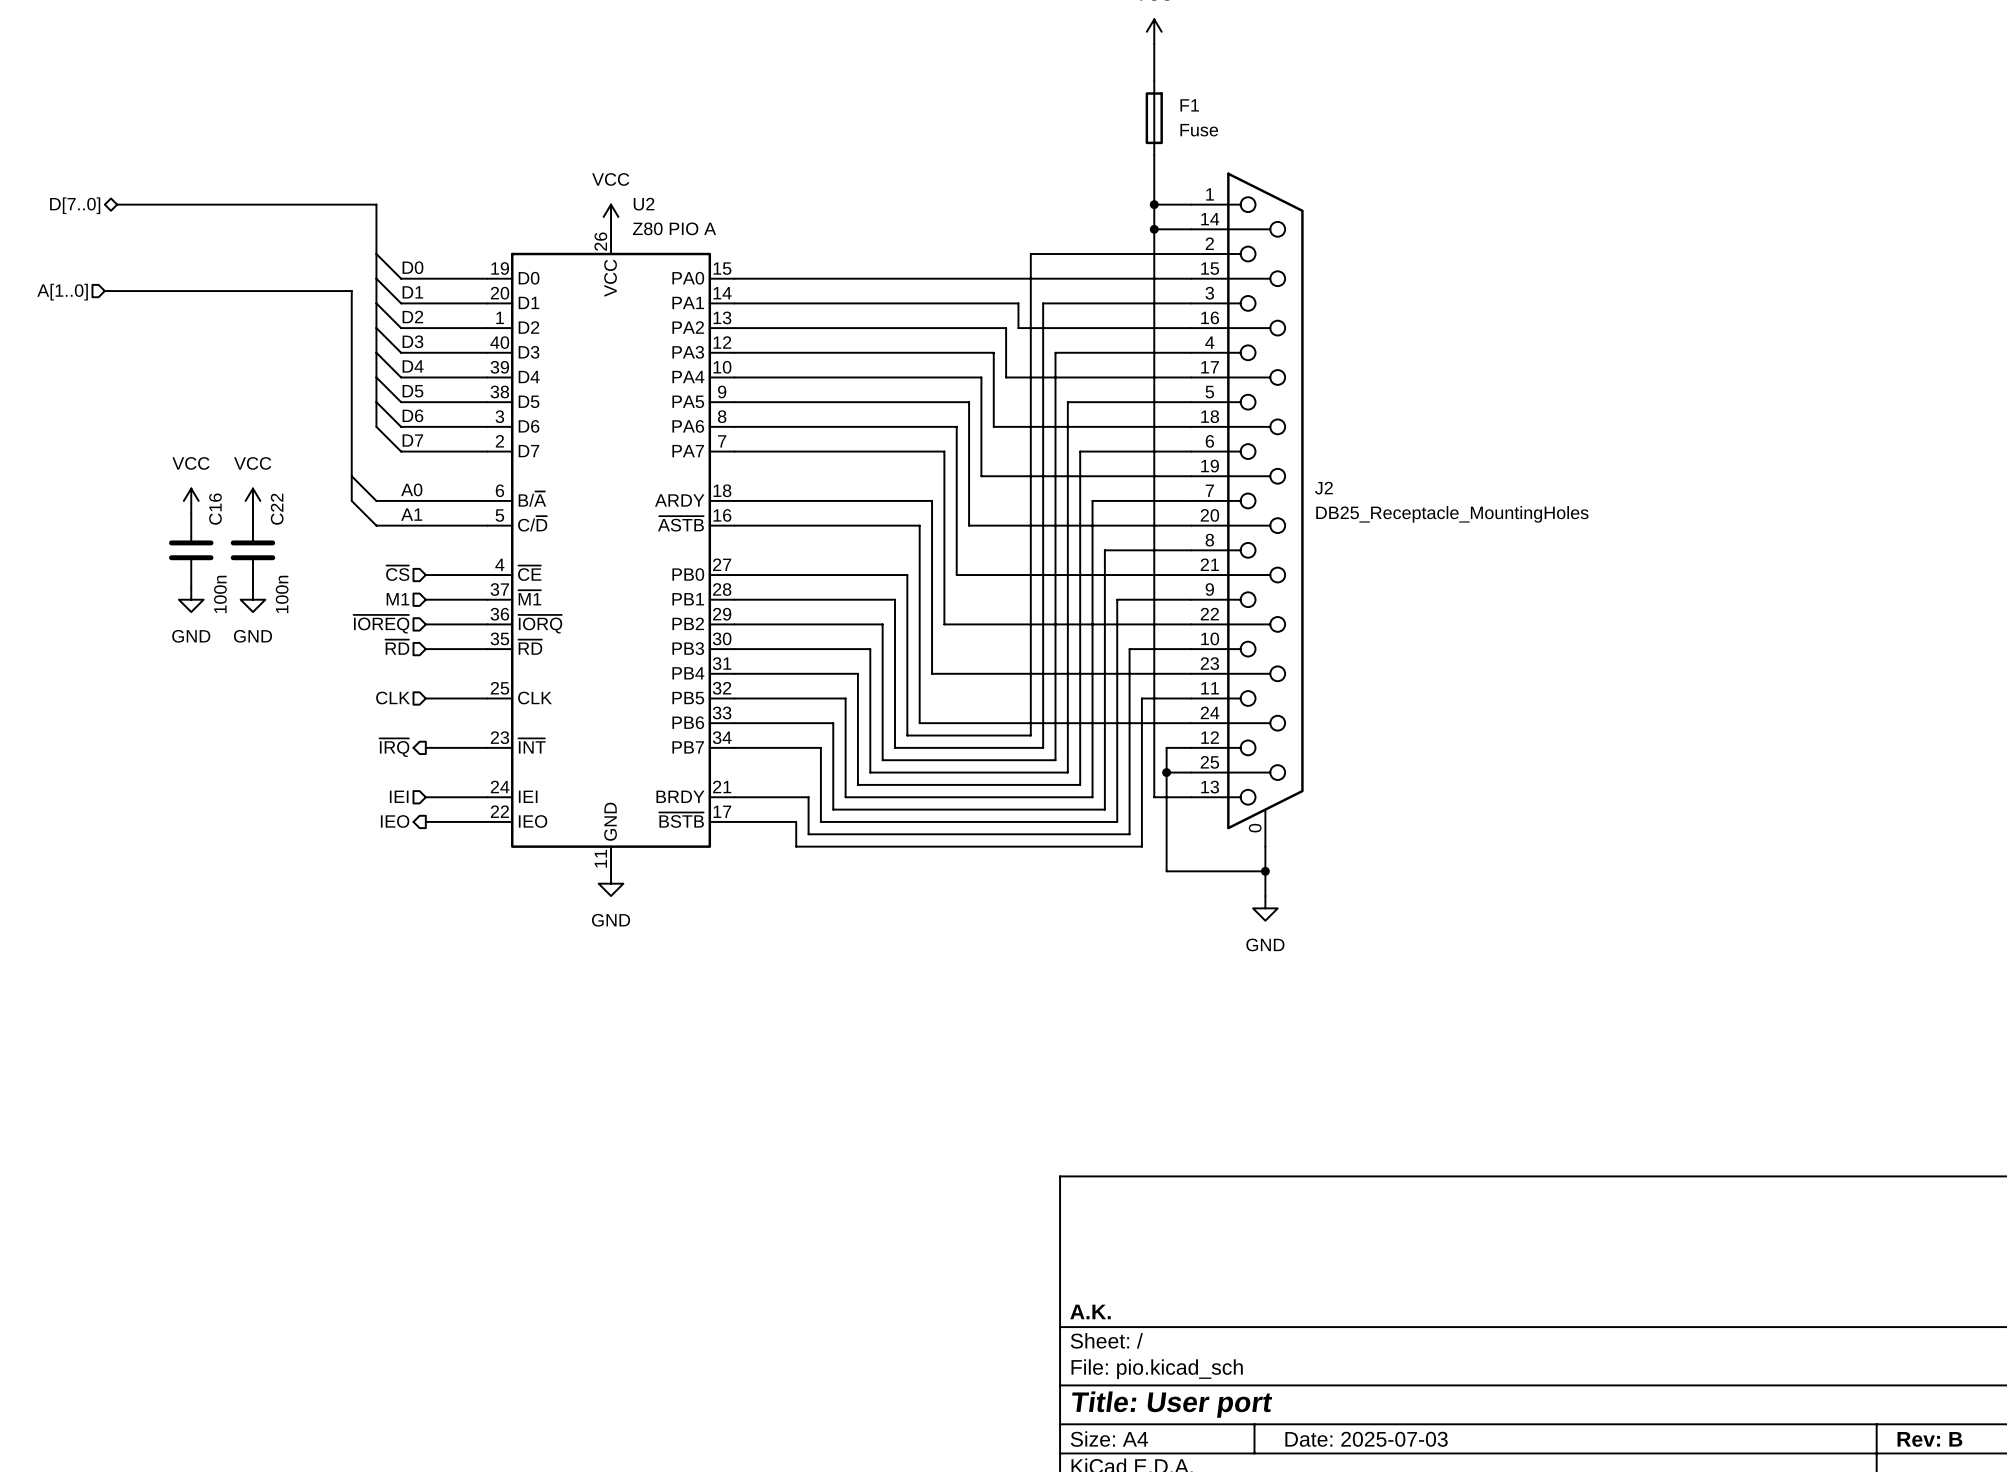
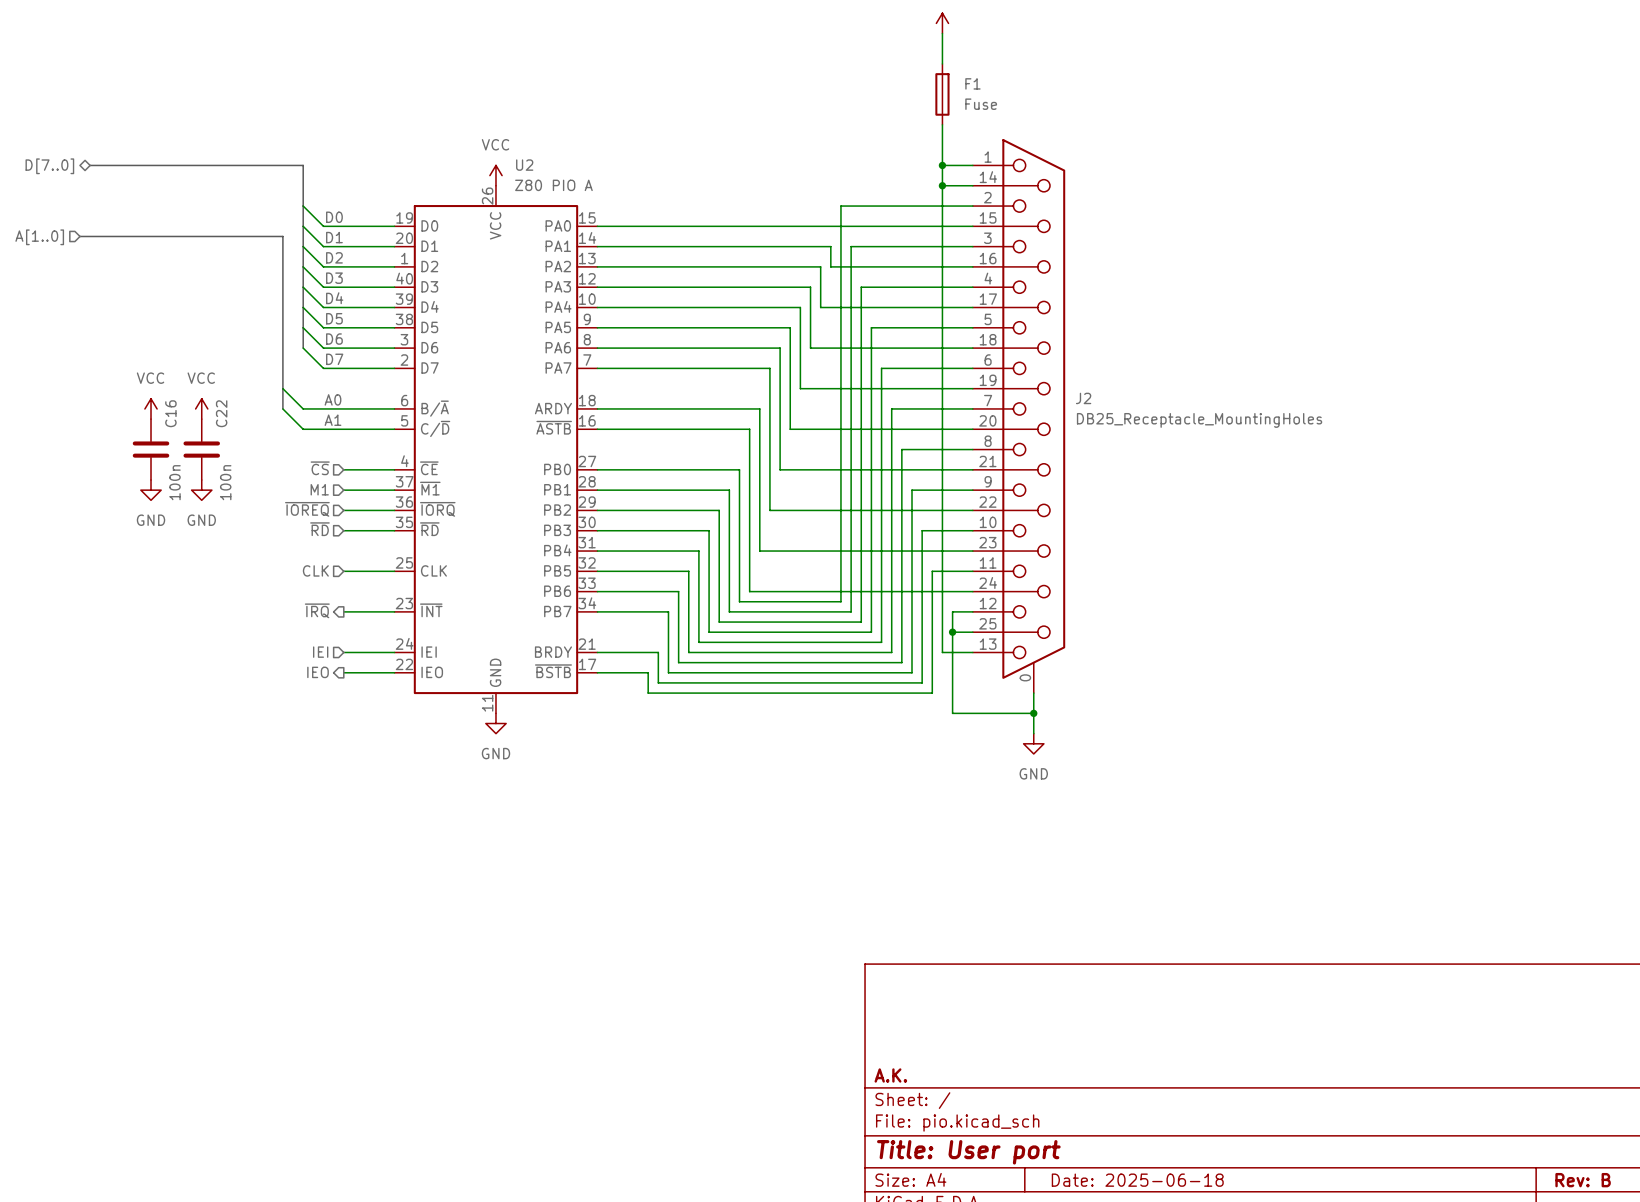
title block: Date: 2025-07-03 (1366, 1439) -> Date: 2025-06-18 (1137, 1180)

